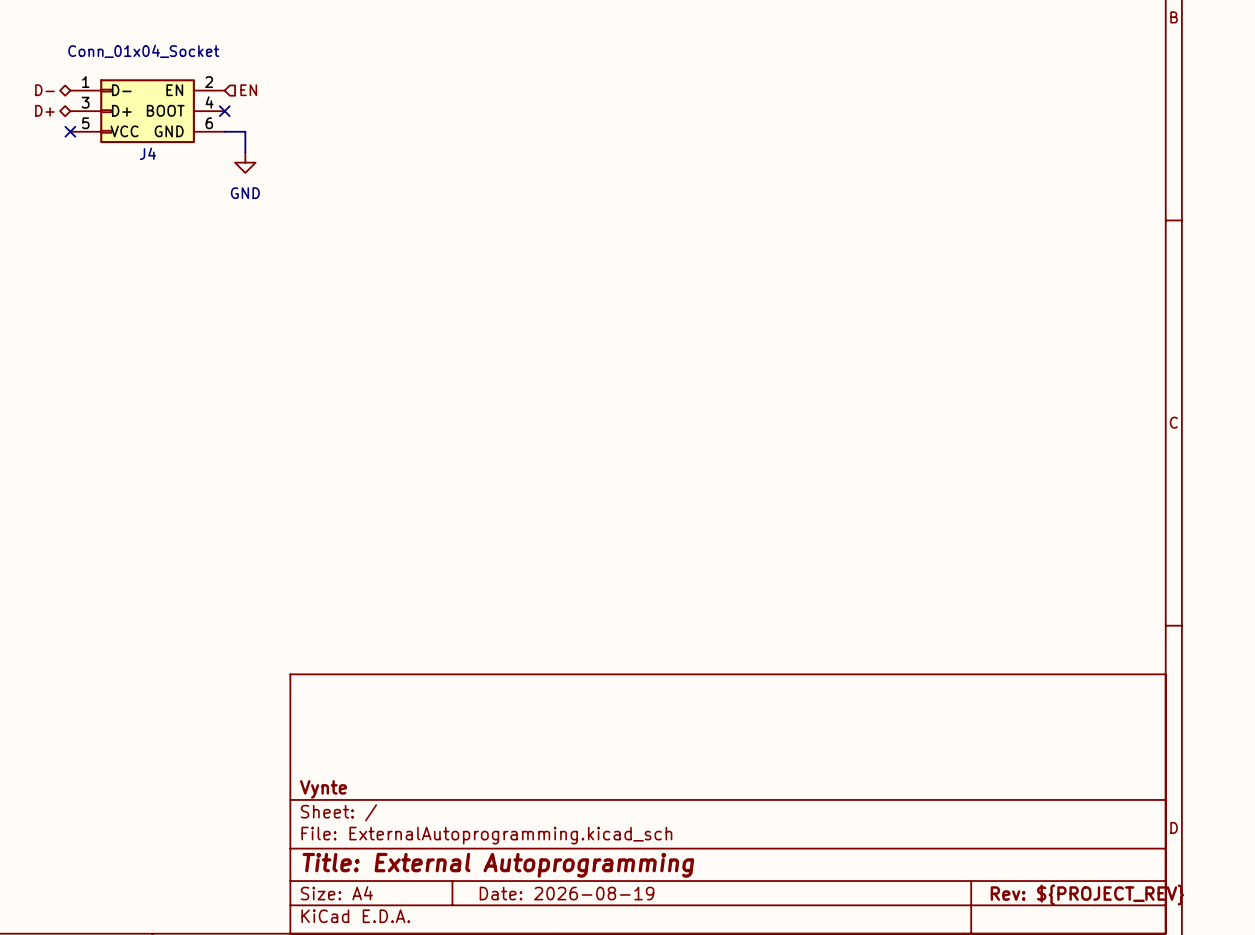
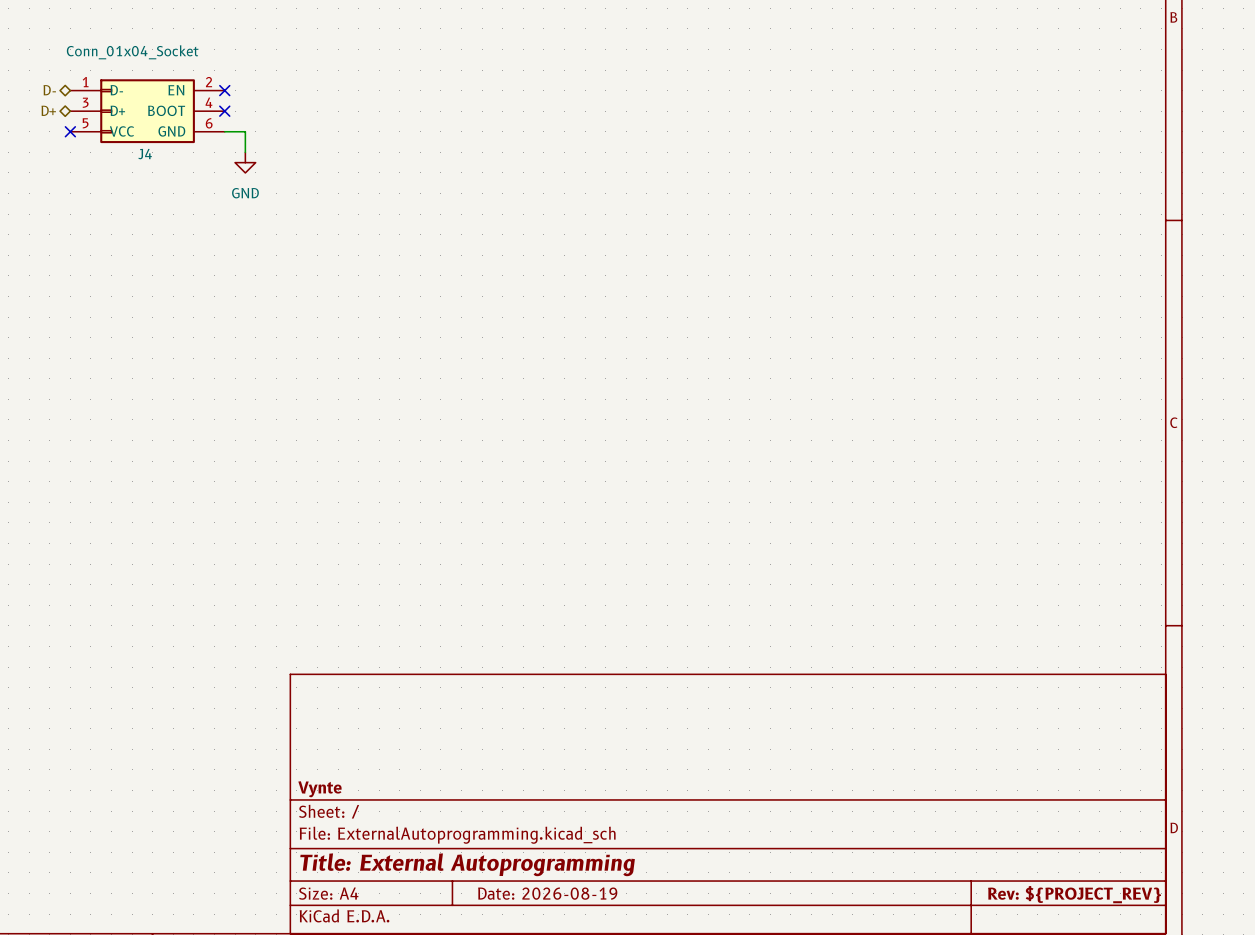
no-connect mark: none -> (224, 90)
hierarchical label: EN (248, 90) -> none

